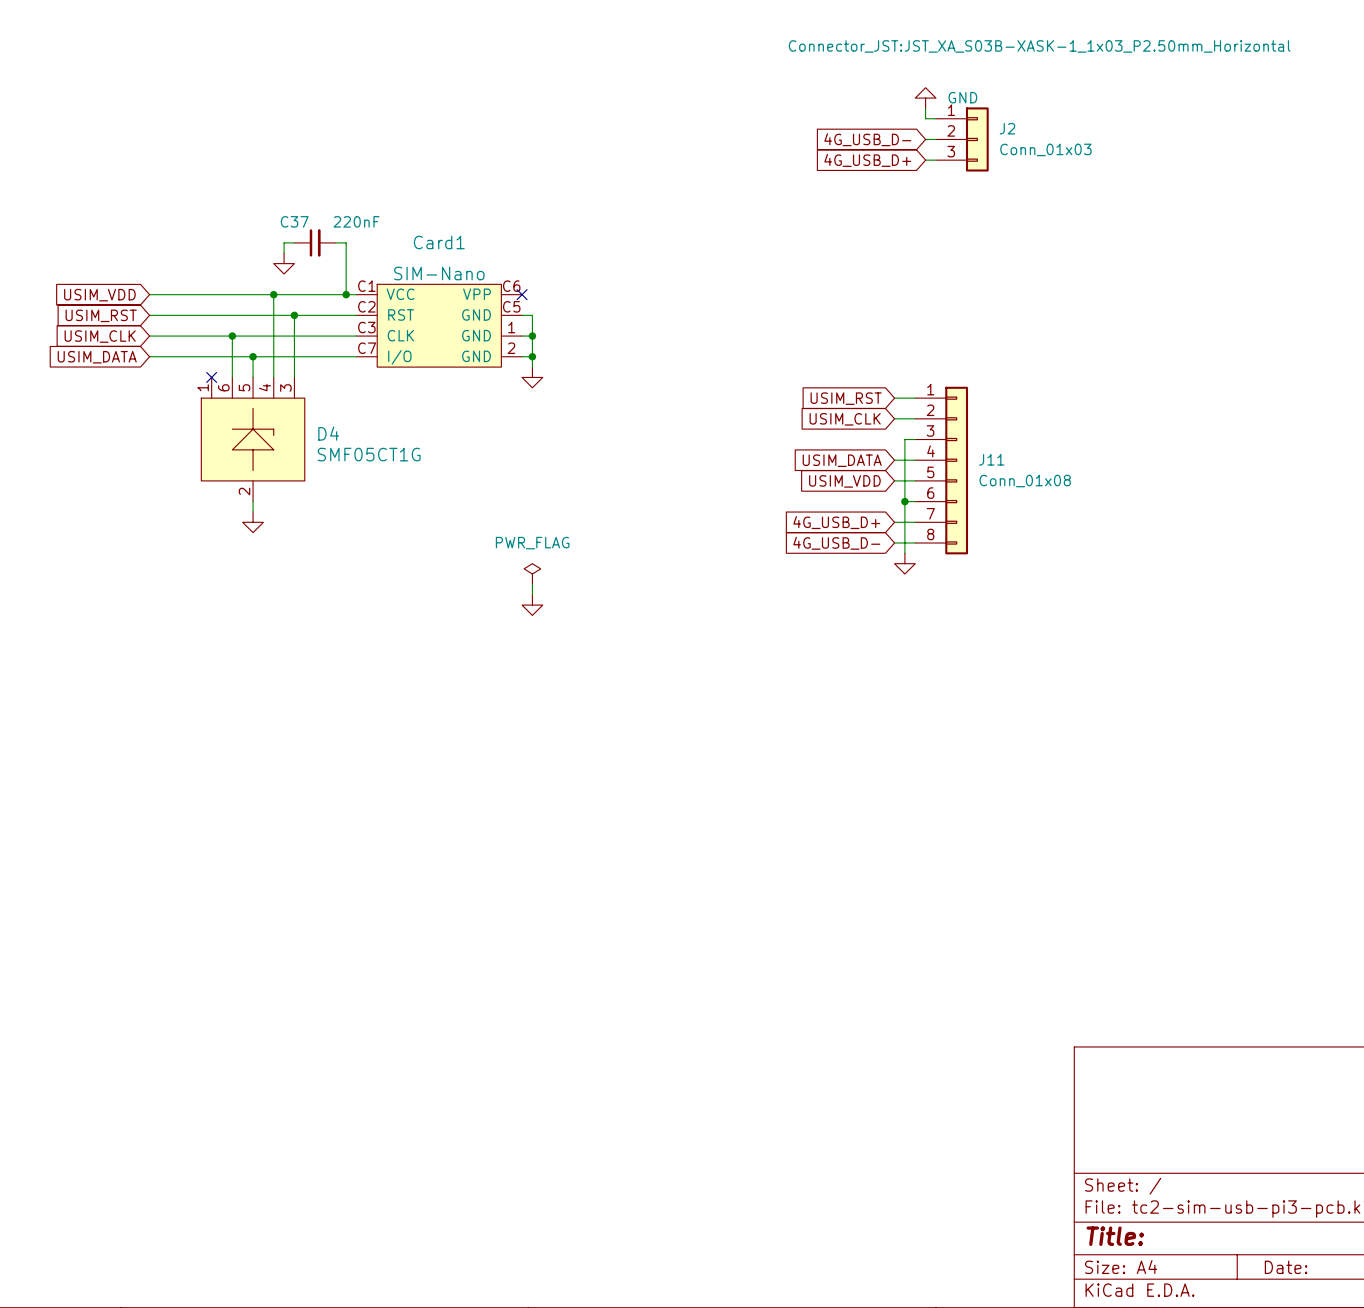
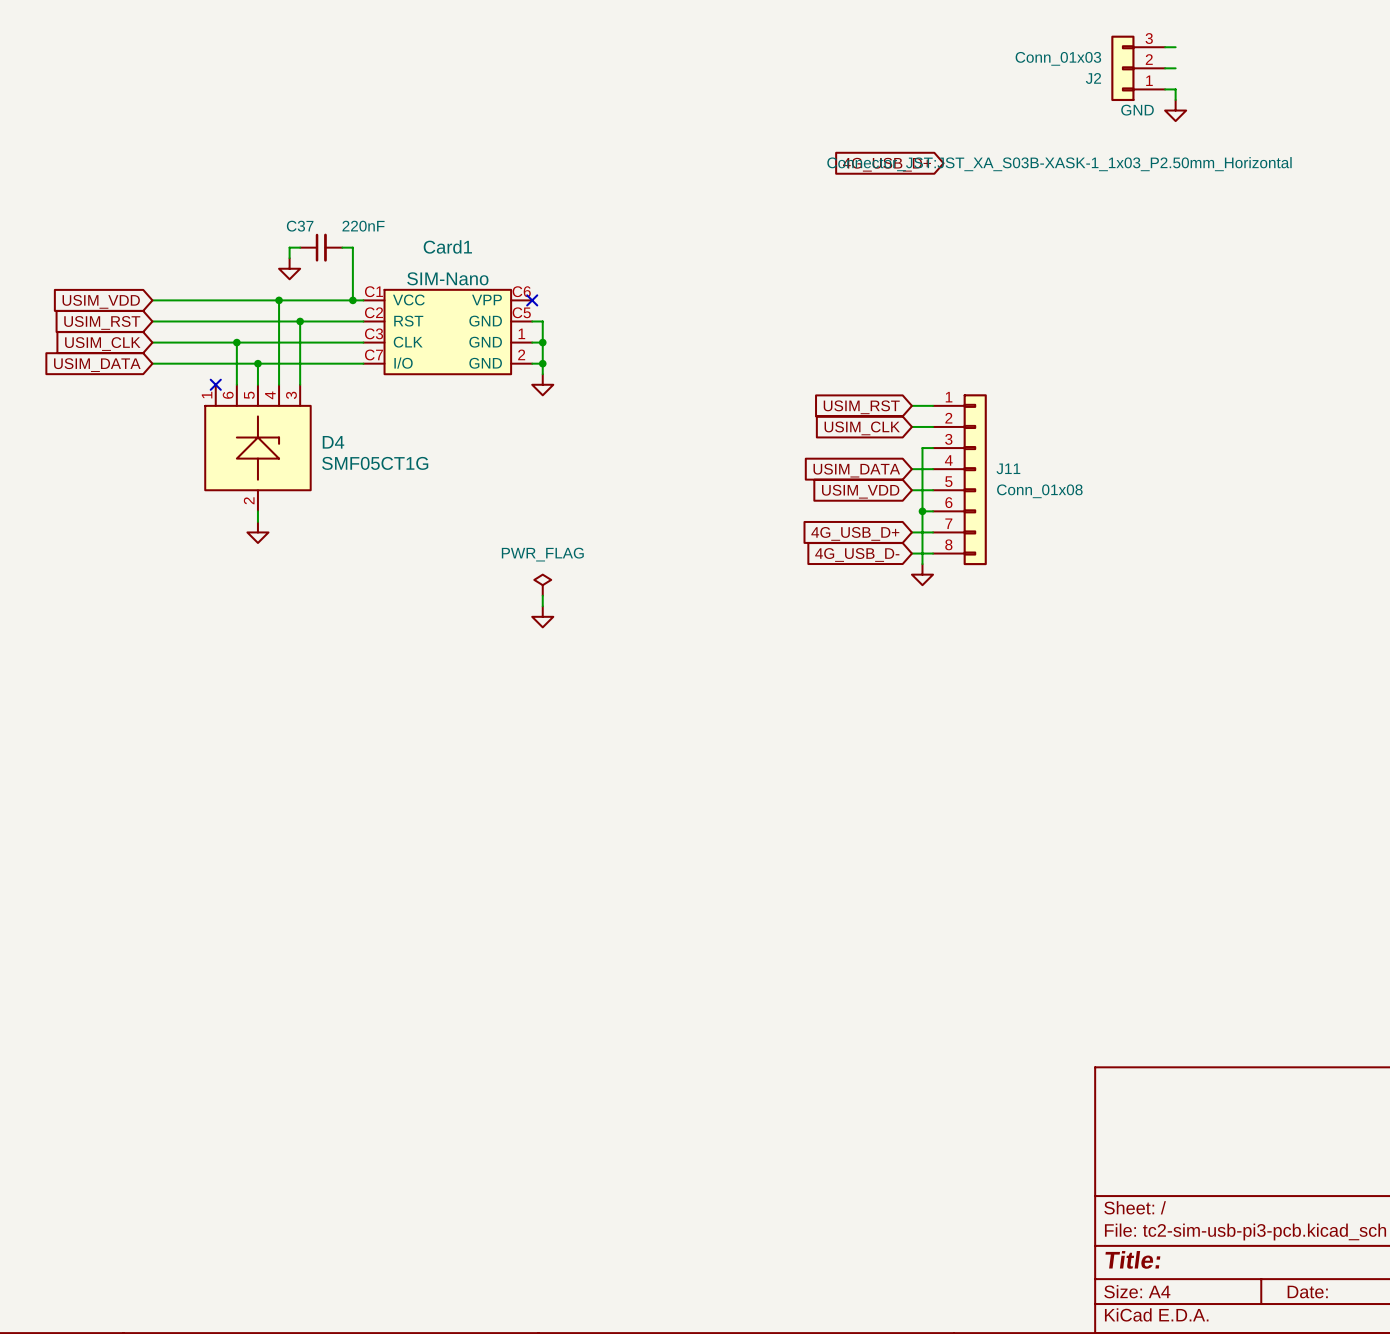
wire: none -> (1165, 47) (1175, 47)
wire: none -> (1165, 68) (1175, 68)
wire: none -> (1165, 89) (1175, 89) (1175, 99)
power symbol: GND (925, 98) -> none
wire: (925, 108) (925, 118) (935, 118) -> none
power symbol: none -> GND (1175, 110)
global label: 4G_USB_D- (867, 139) -> none
wire: (925, 139) (935, 139) -> none
J2 position: (962, 139) -> (1138, 68)
J2 rotation: 0° (977, 139) -> 180° (1122, 68)
wire: (925, 160) (935, 160) -> none

